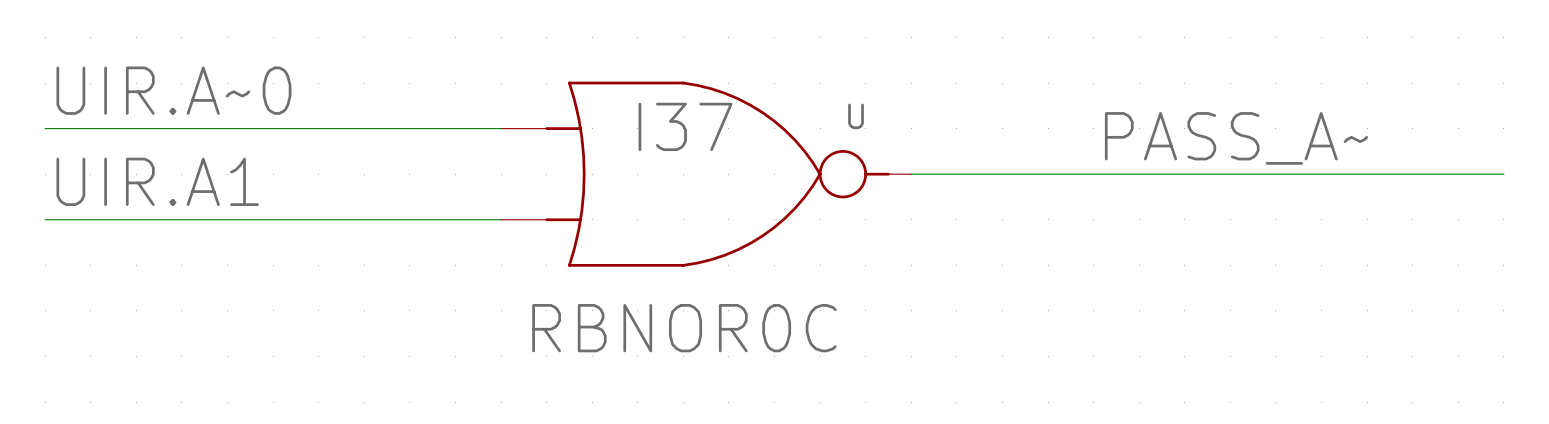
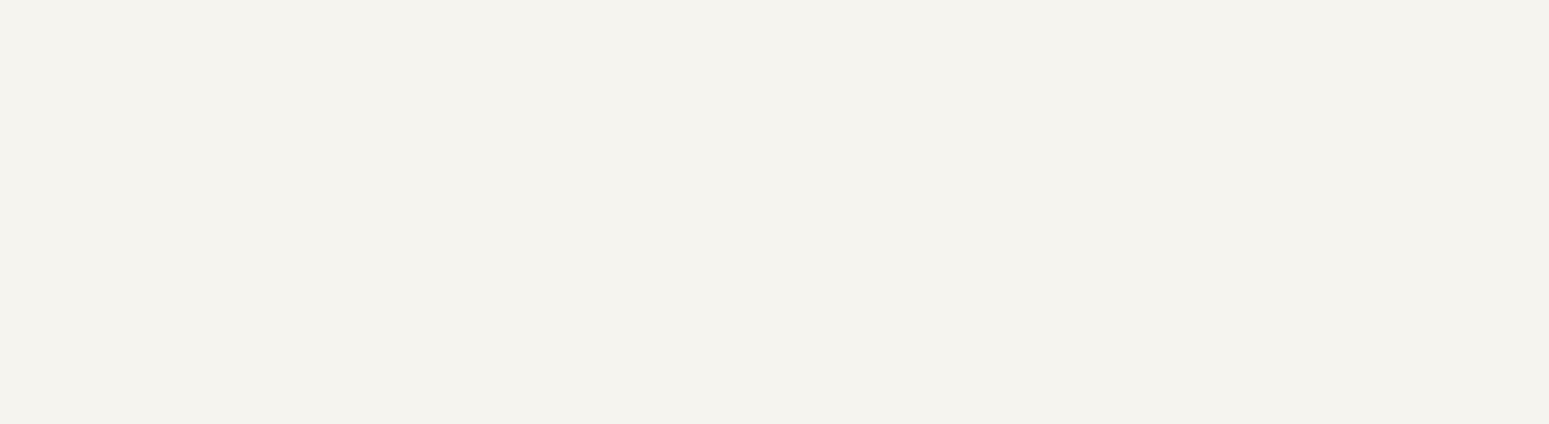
label: UIR.A~0 (173, 90) -> none
wire: (45, 128) (501, 128) -> none
label: PASS_A~ (1236, 138) -> none
U: (706, 174) -> none
wire: (911, 174) (1503, 174) -> none
label: UIR.A1 (157, 181) -> none
wire: (45, 219) (501, 219) -> none

